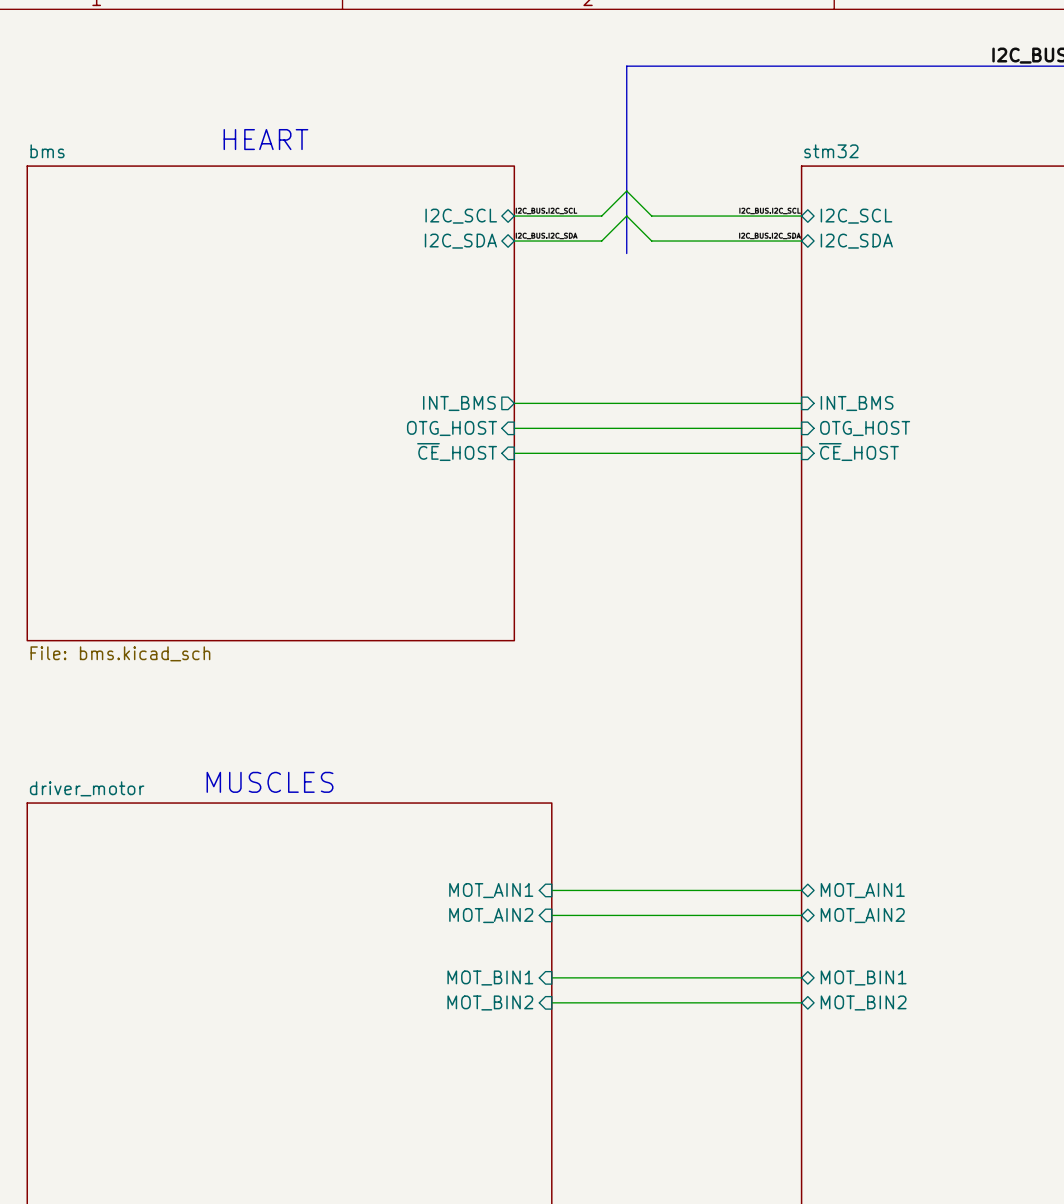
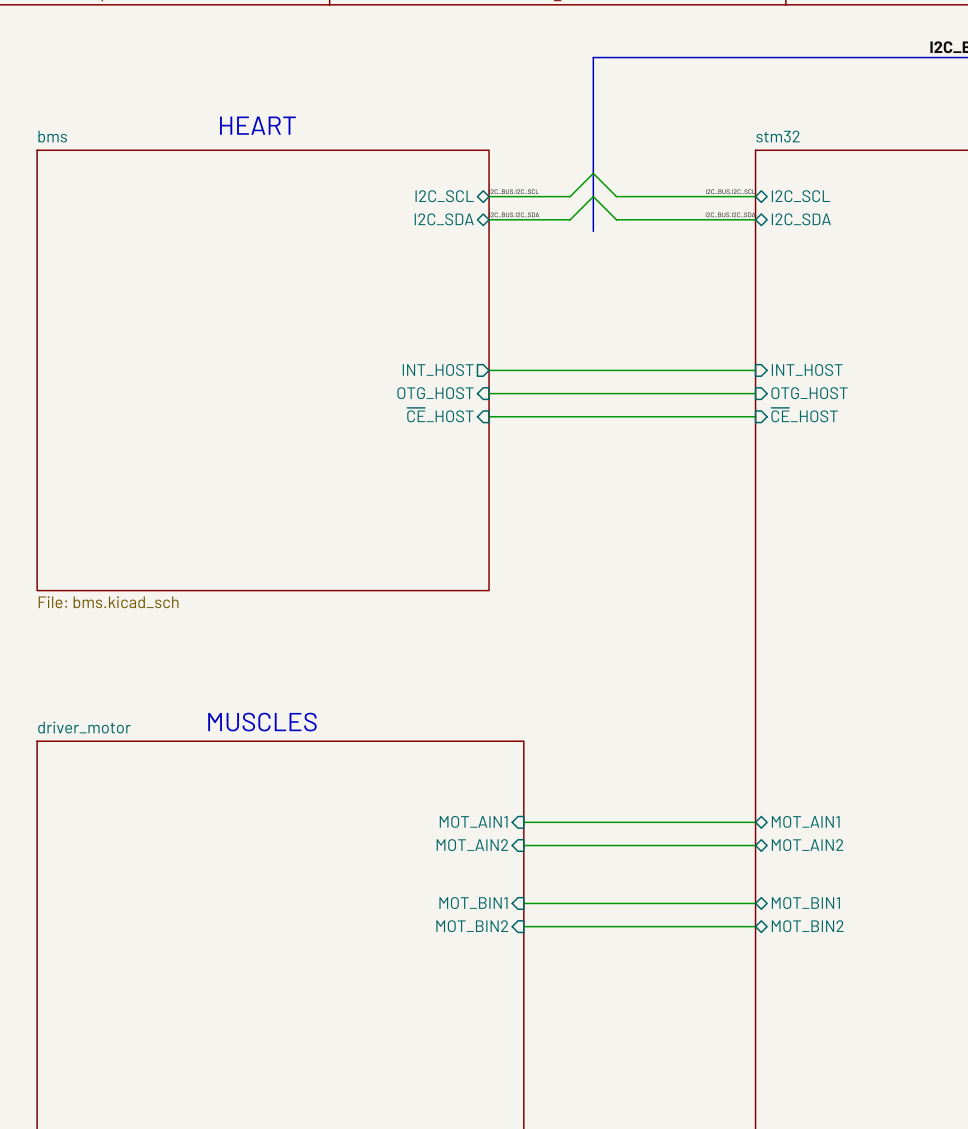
sheet pin: INT_BMS (459, 403) -> INT_HOST (438, 369)
sheet pin: INT_BMS (857, 403) -> INT_HOST (807, 369)

